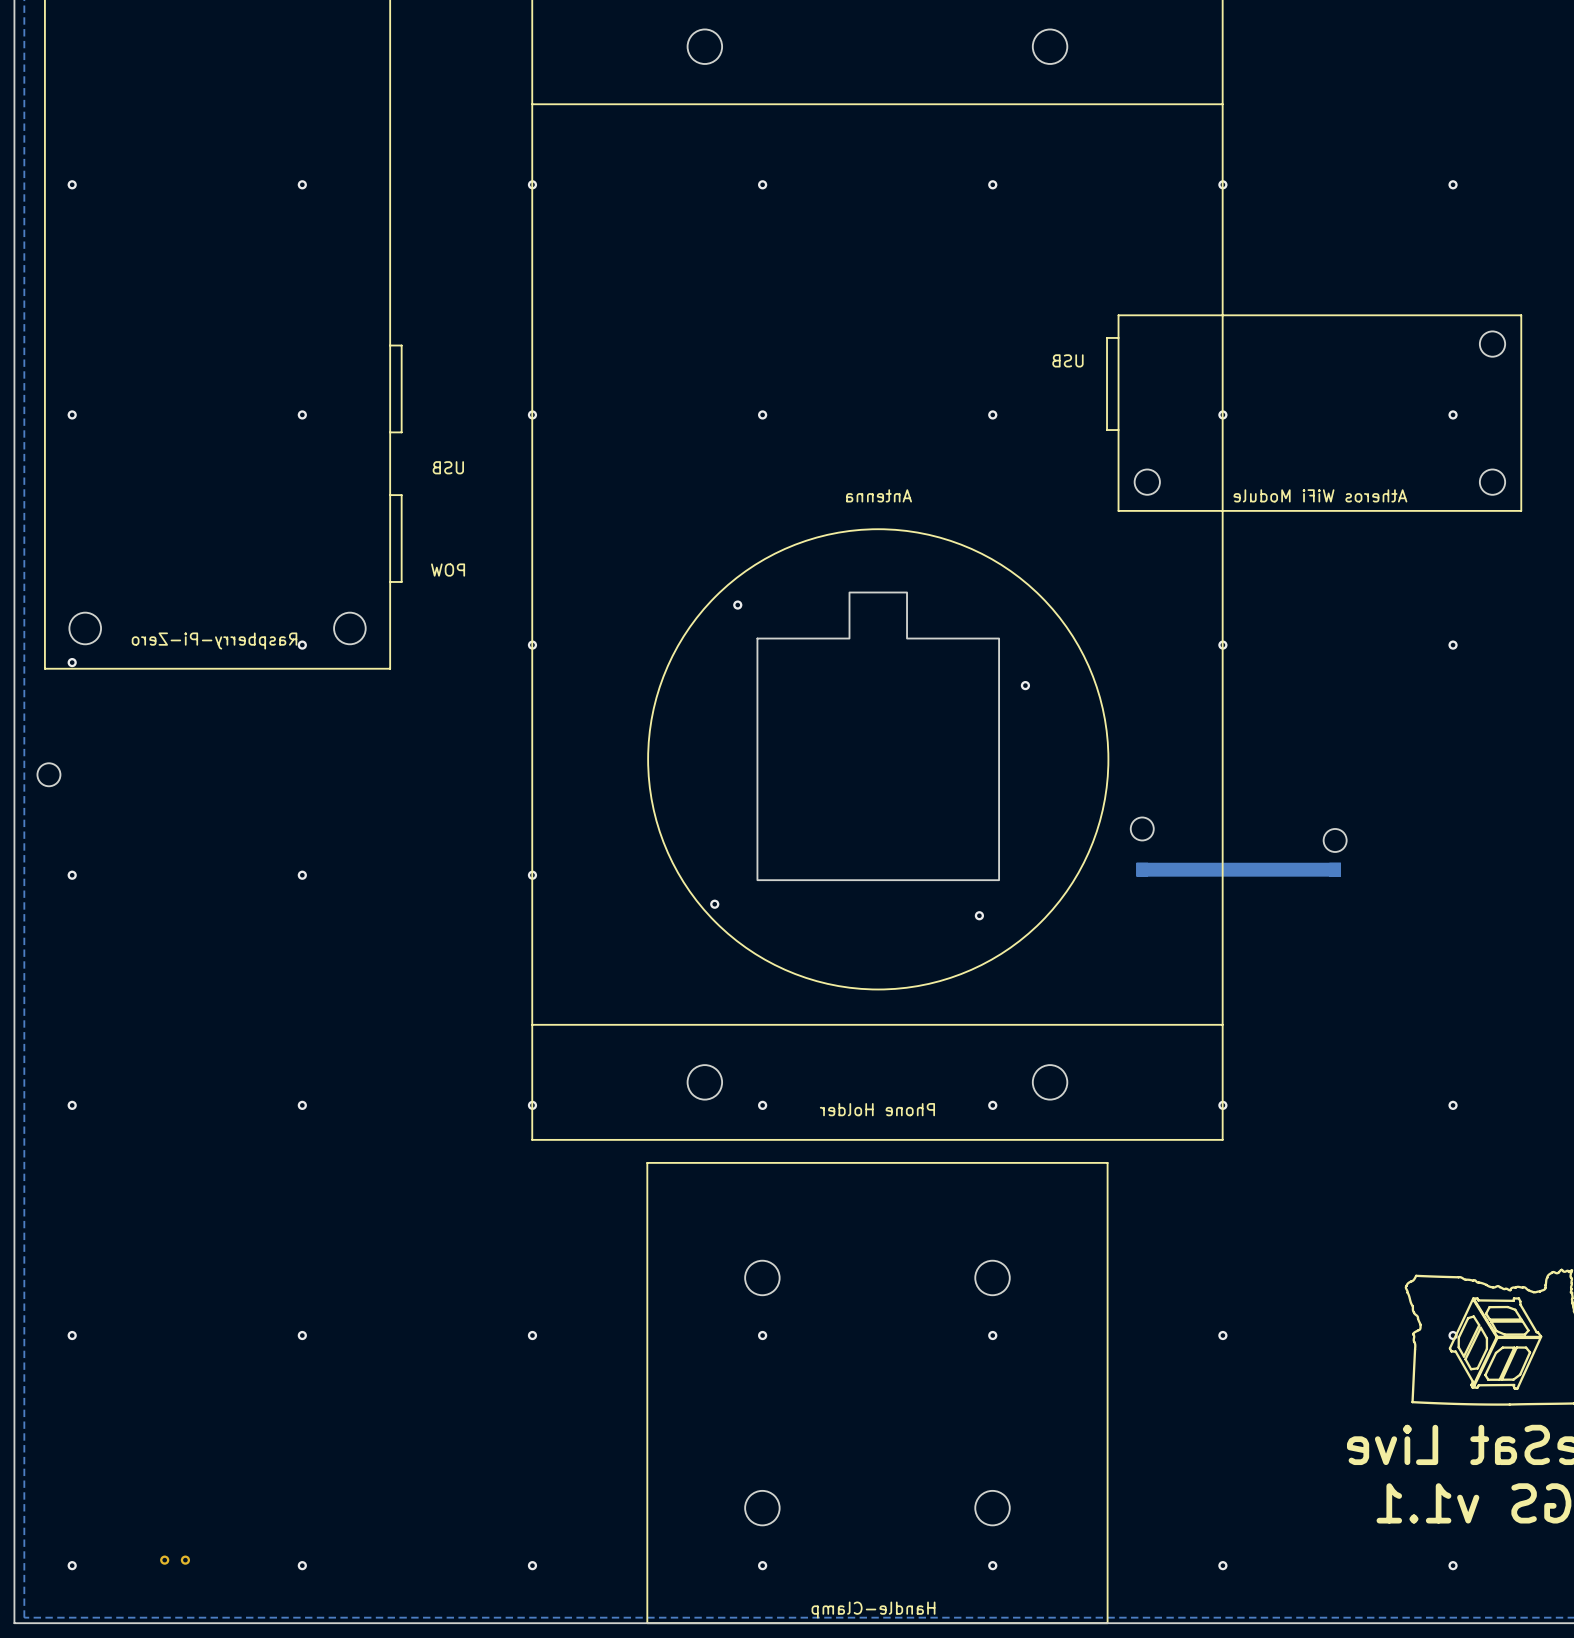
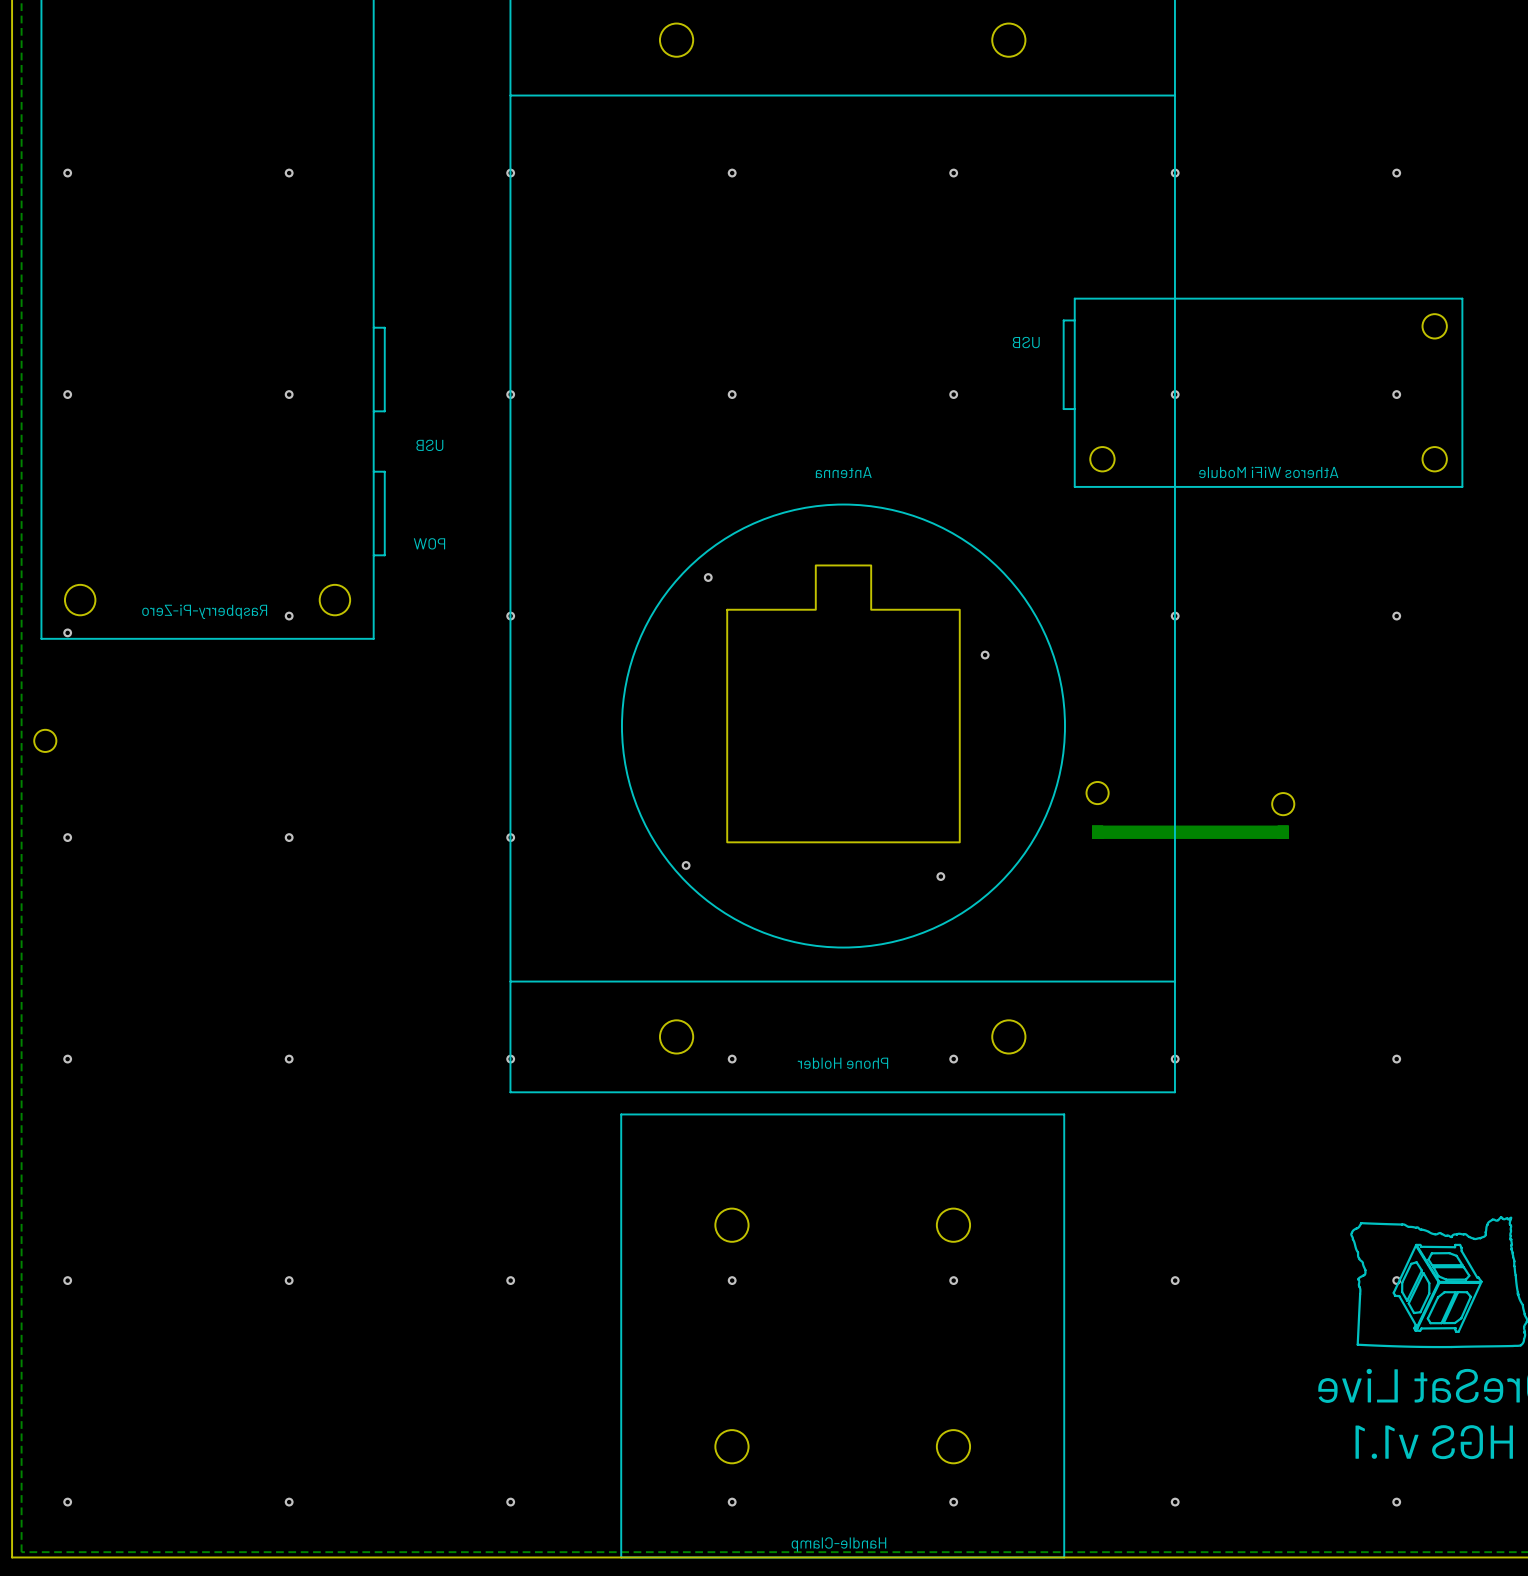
part: (164, 1560) -> none
part: (185, 1560) -> none

